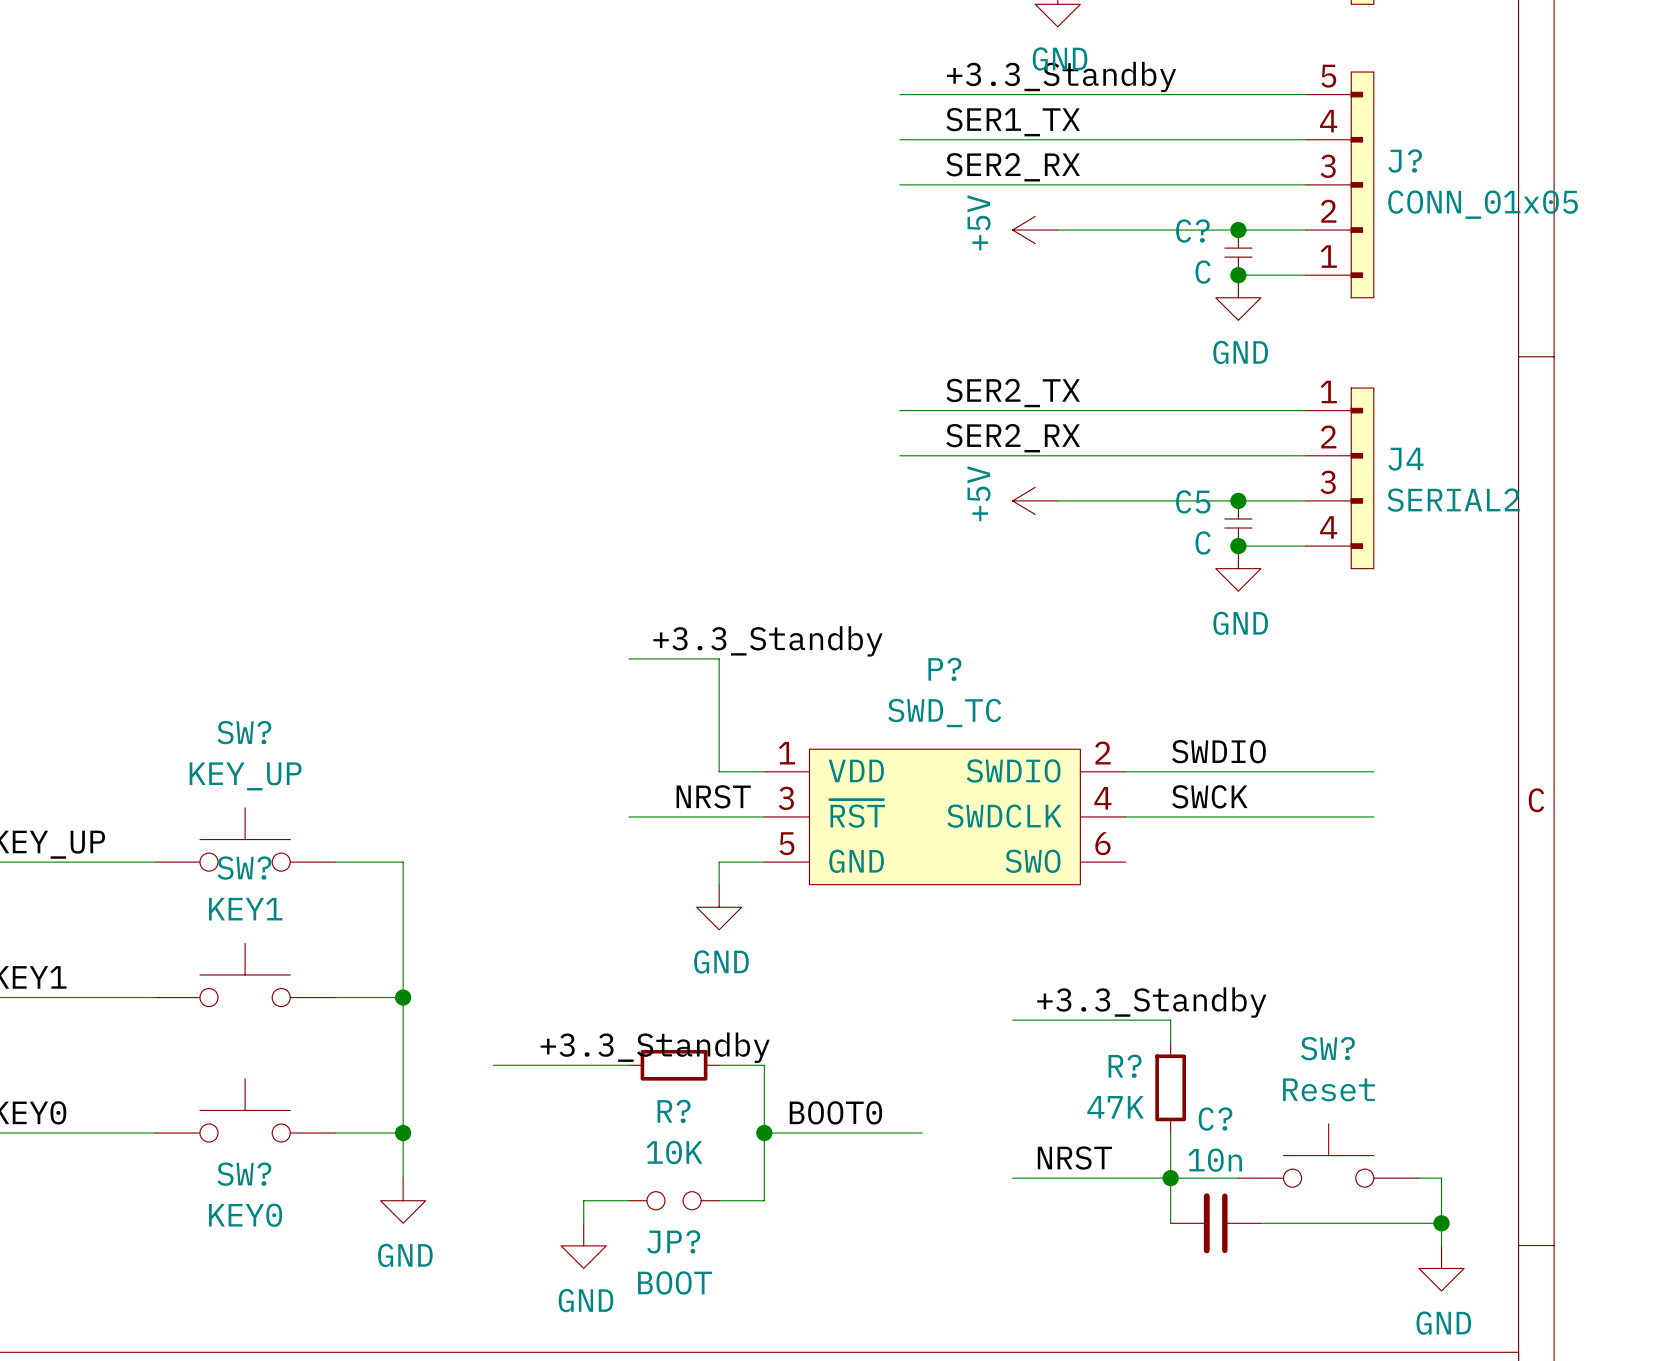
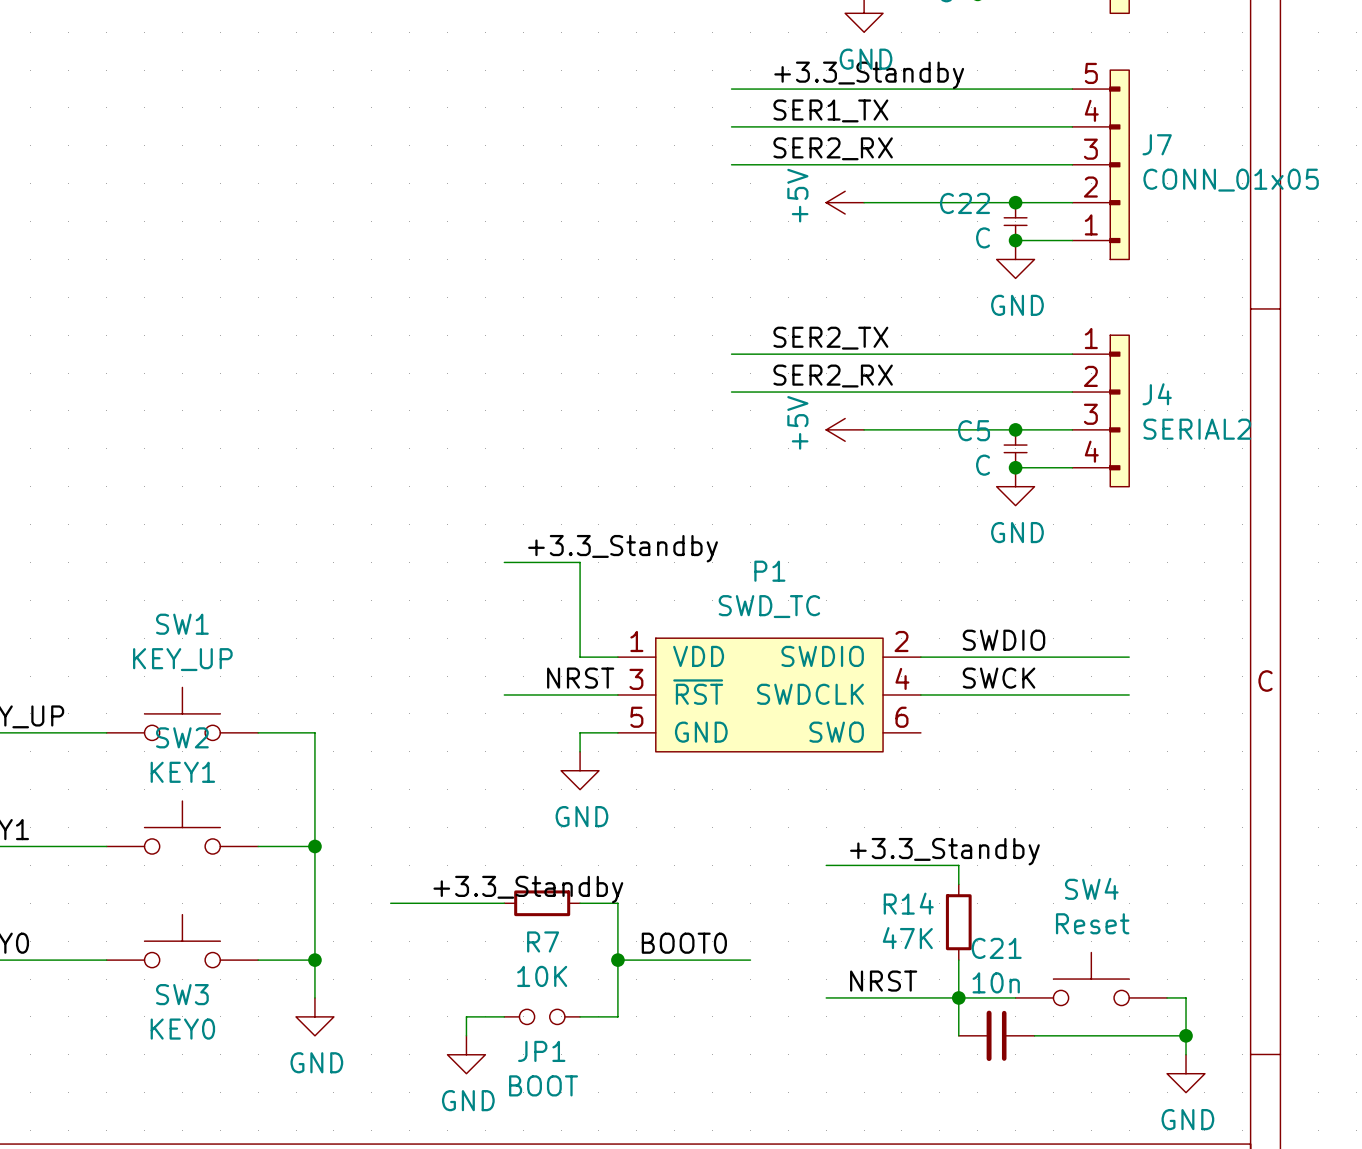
J? name: J? (1405, 161) -> J7 (1157, 144)
C? name: C? (1192, 231) -> C22 (965, 203)
P? name: P? (944, 669) -> P1 (769, 571)
SW? name: SW? (244, 732) -> SW1 (182, 624)
SW? name: SW? (244, 868) -> SW2 (182, 737)
SW? name: SW? (1327, 1048) -> SW4 (1091, 888)
R? name: R? (1125, 1066) -> R14 (908, 903)
R? name: R? (674, 1111) -> R7 (543, 941)
C? name: C? (1215, 1119) -> C21 (996, 948)
SW? name: SW? (244, 1174) -> SW3 (182, 994)
JP? name: JP? (673, 1241) -> JP1 (541, 1051)

